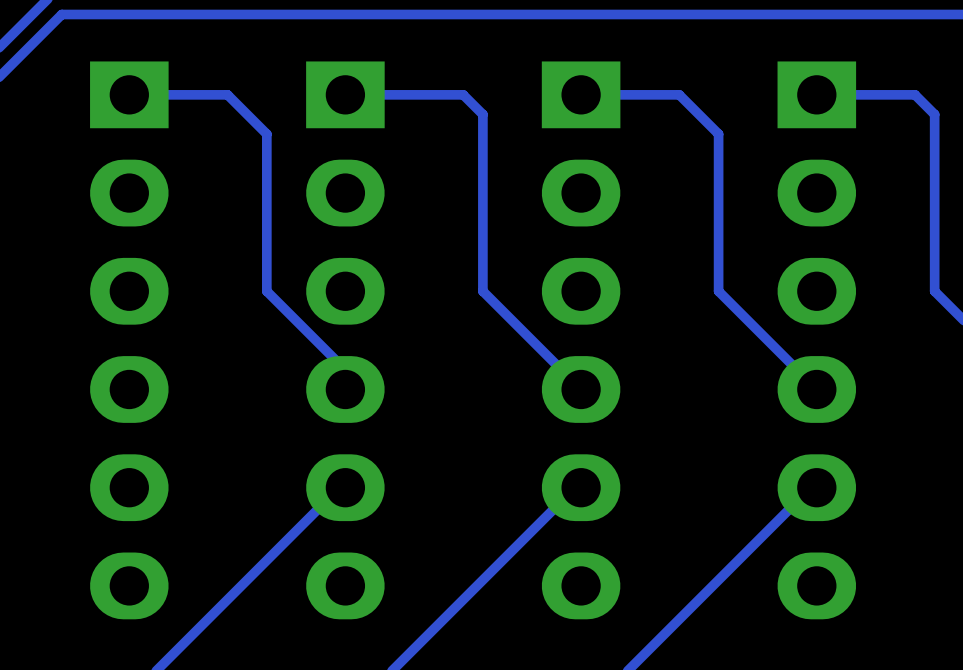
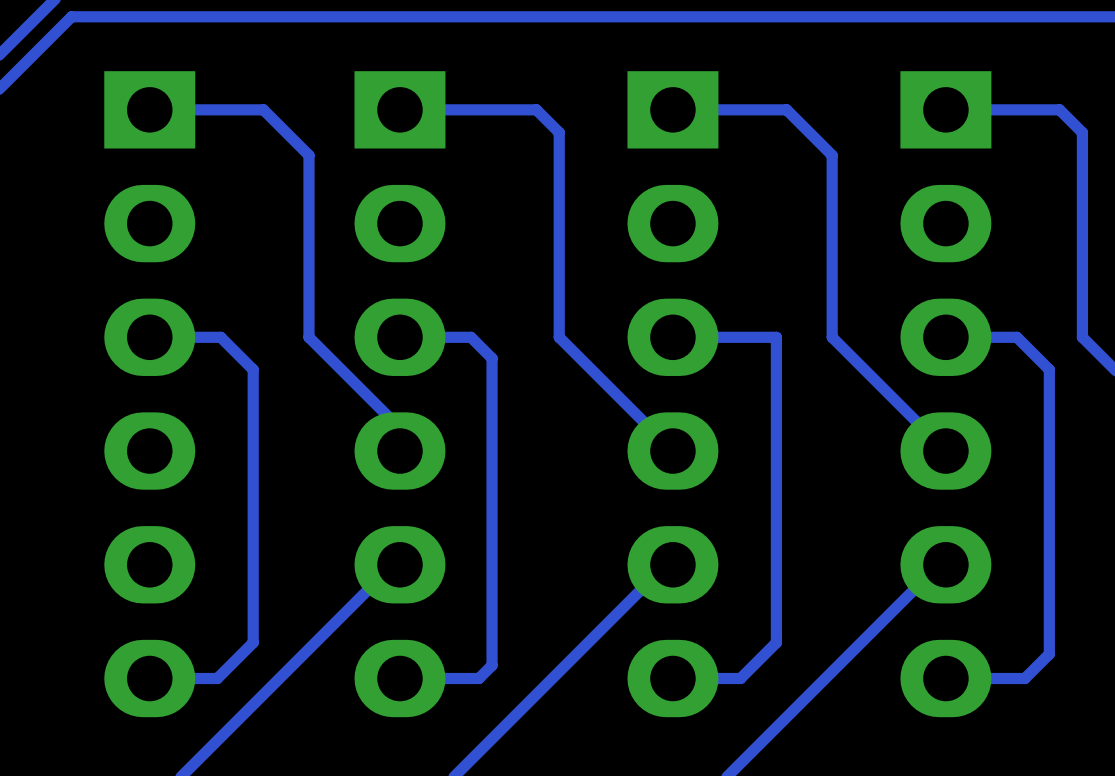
track: none -> (149, 337) (220, 337) (253, 369) (253, 642) (217, 678) (149, 678)
track: none -> (399, 337) (471, 337) (492, 358) (492, 665) (478, 678) (399, 678)
track: none -> (672, 337) (776, 337) (776, 642) (740, 678) (672, 678)
track: none -> (945, 337) (1016, 337) (1049, 369) (1049, 654) (1024, 678) (945, 678)

